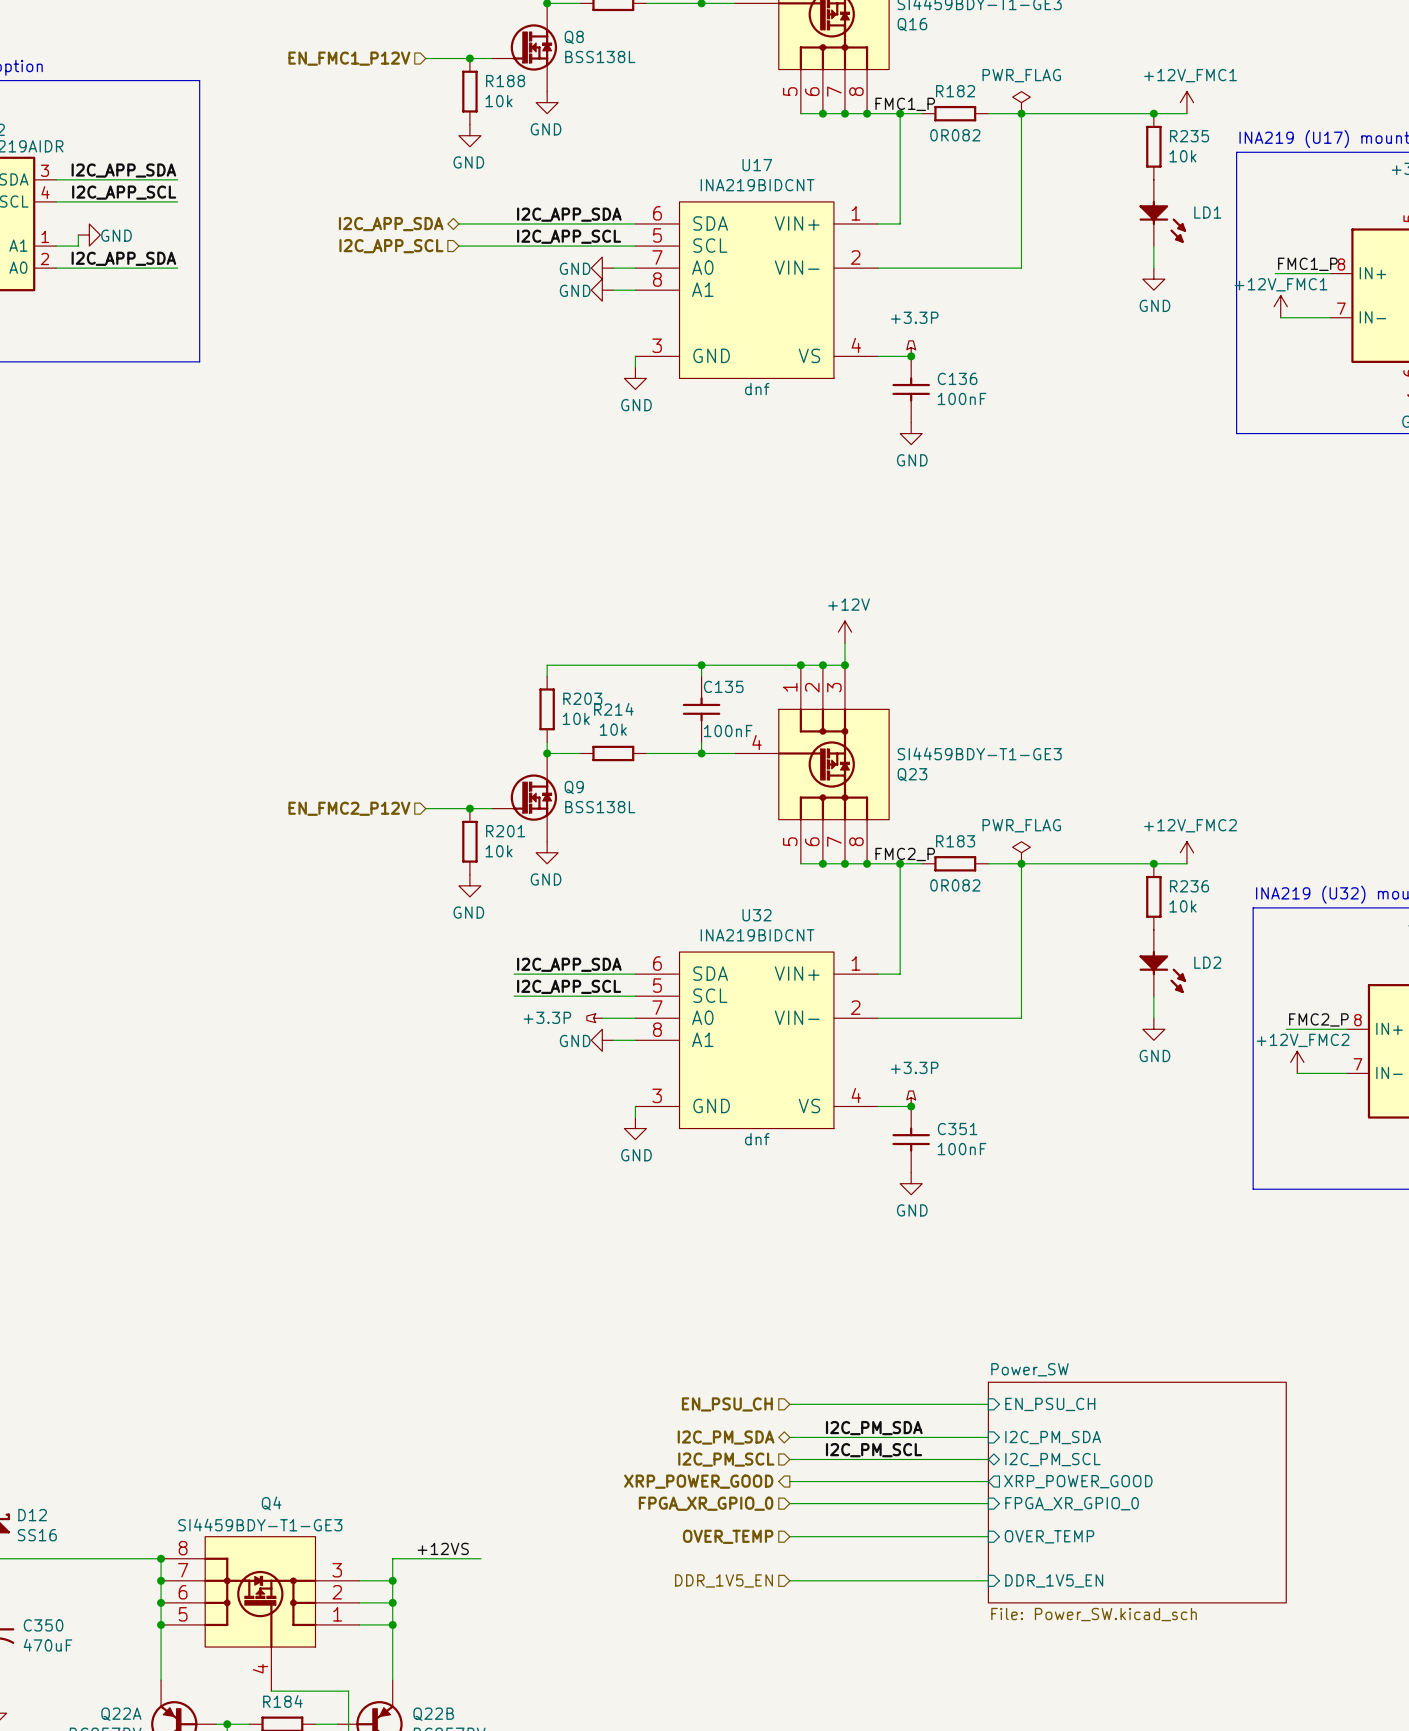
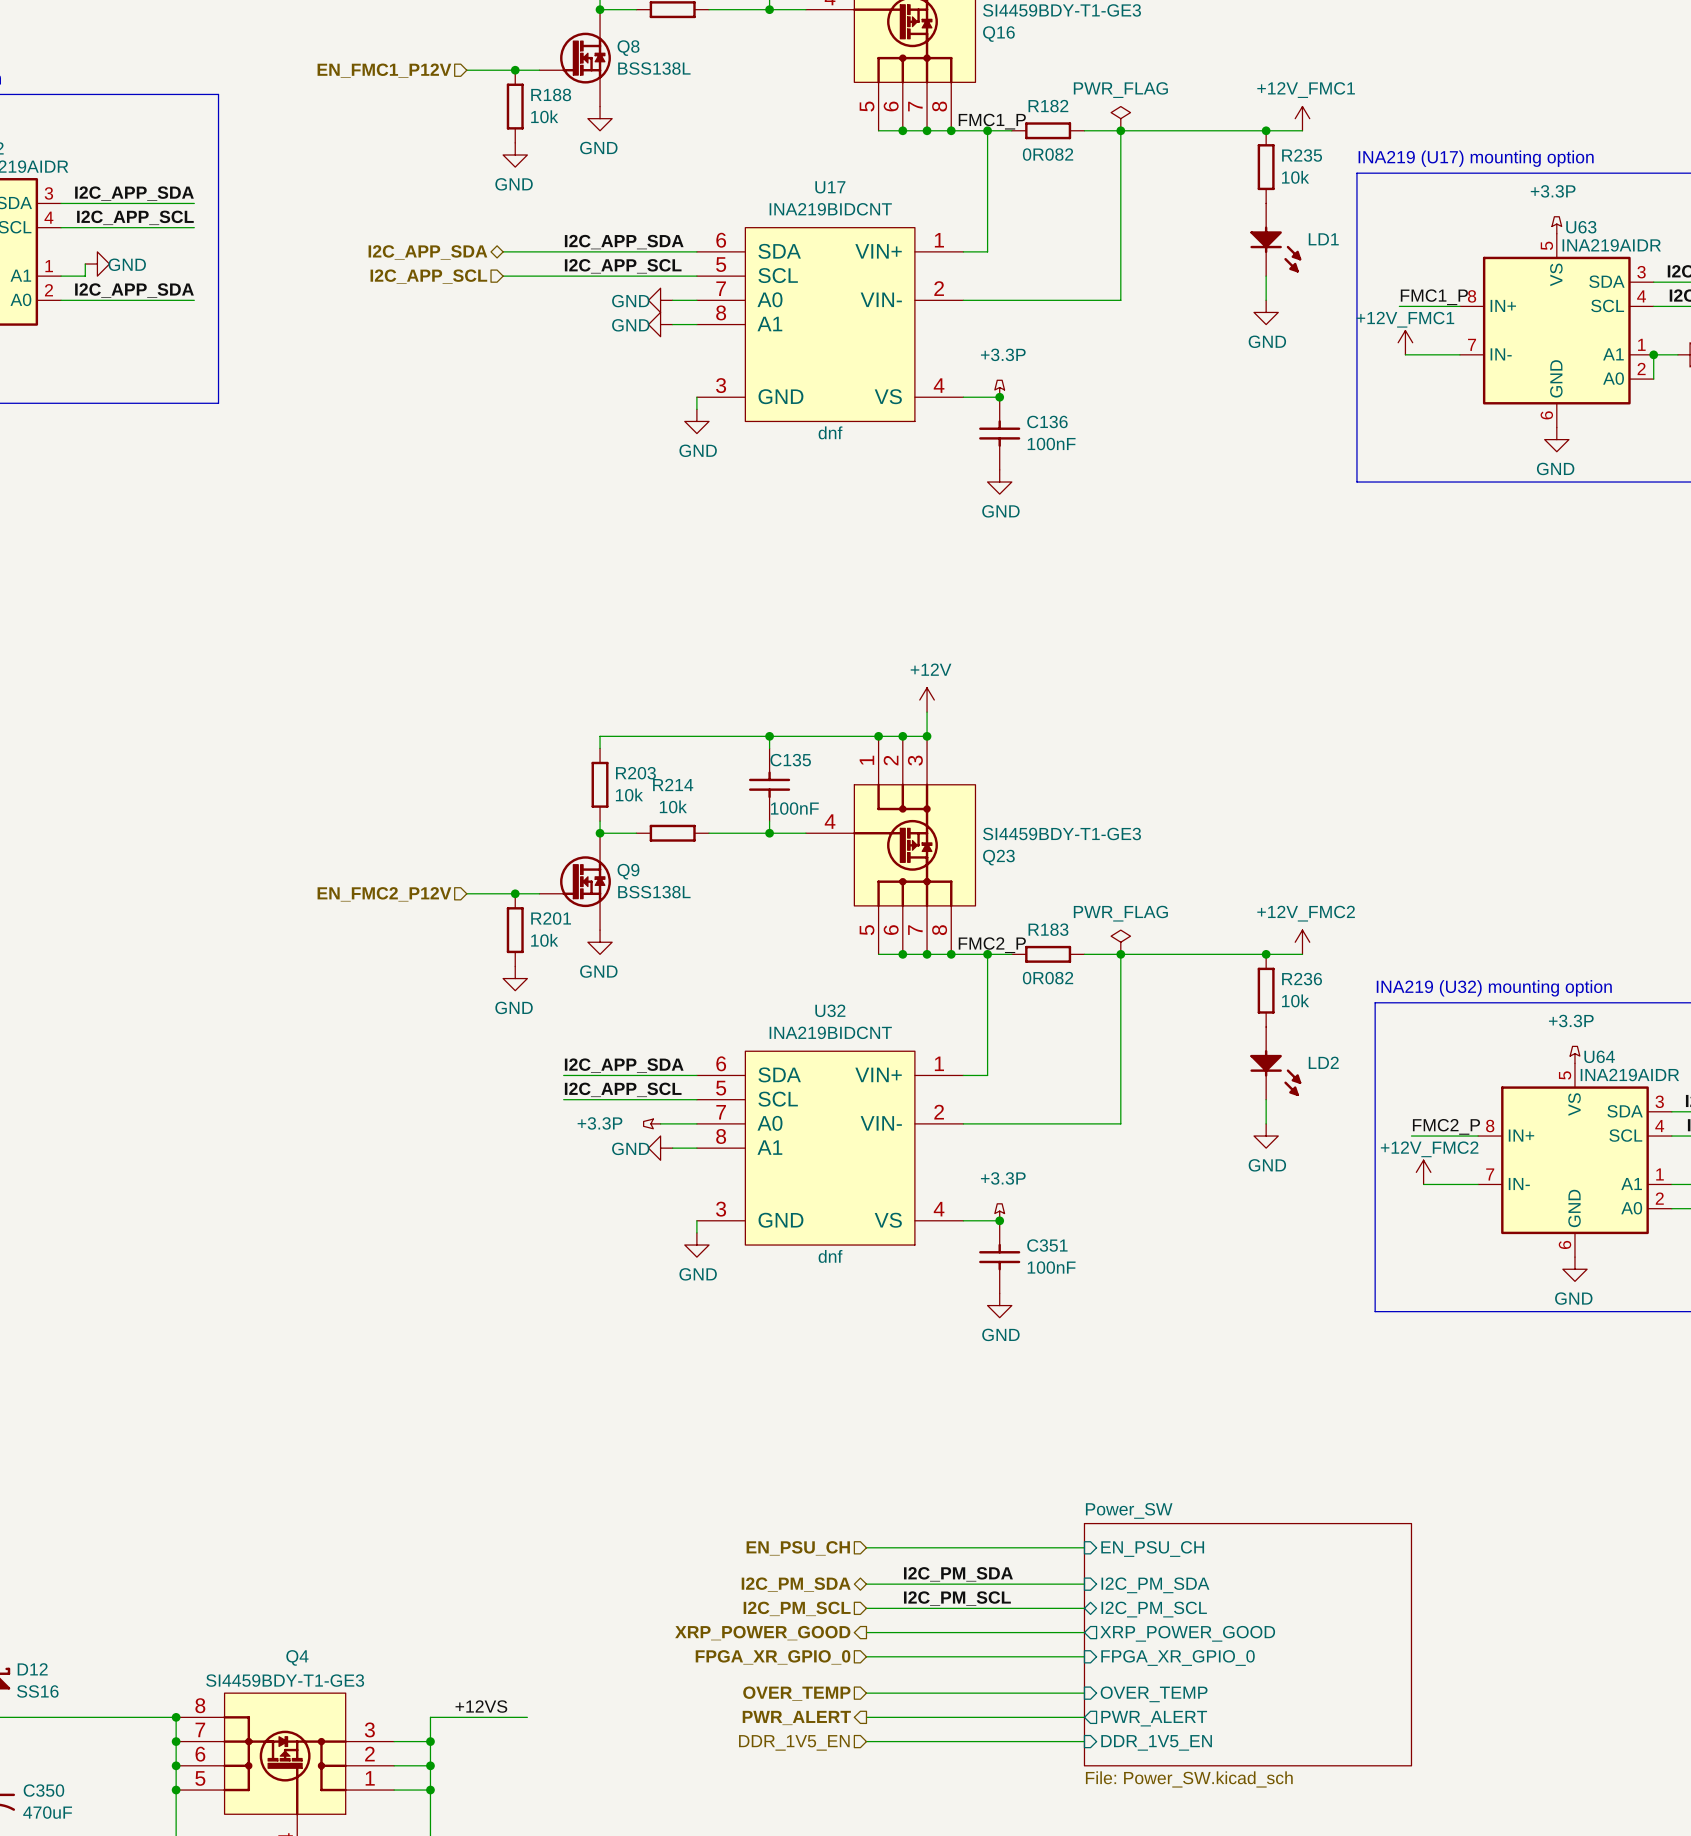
hierarchical label: none -> PWR_ALERT (796, 1717)
wire: none -> (866, 1717) (1084, 1717)
sheet pin: none -> PWR_ALERT (1154, 1718)

